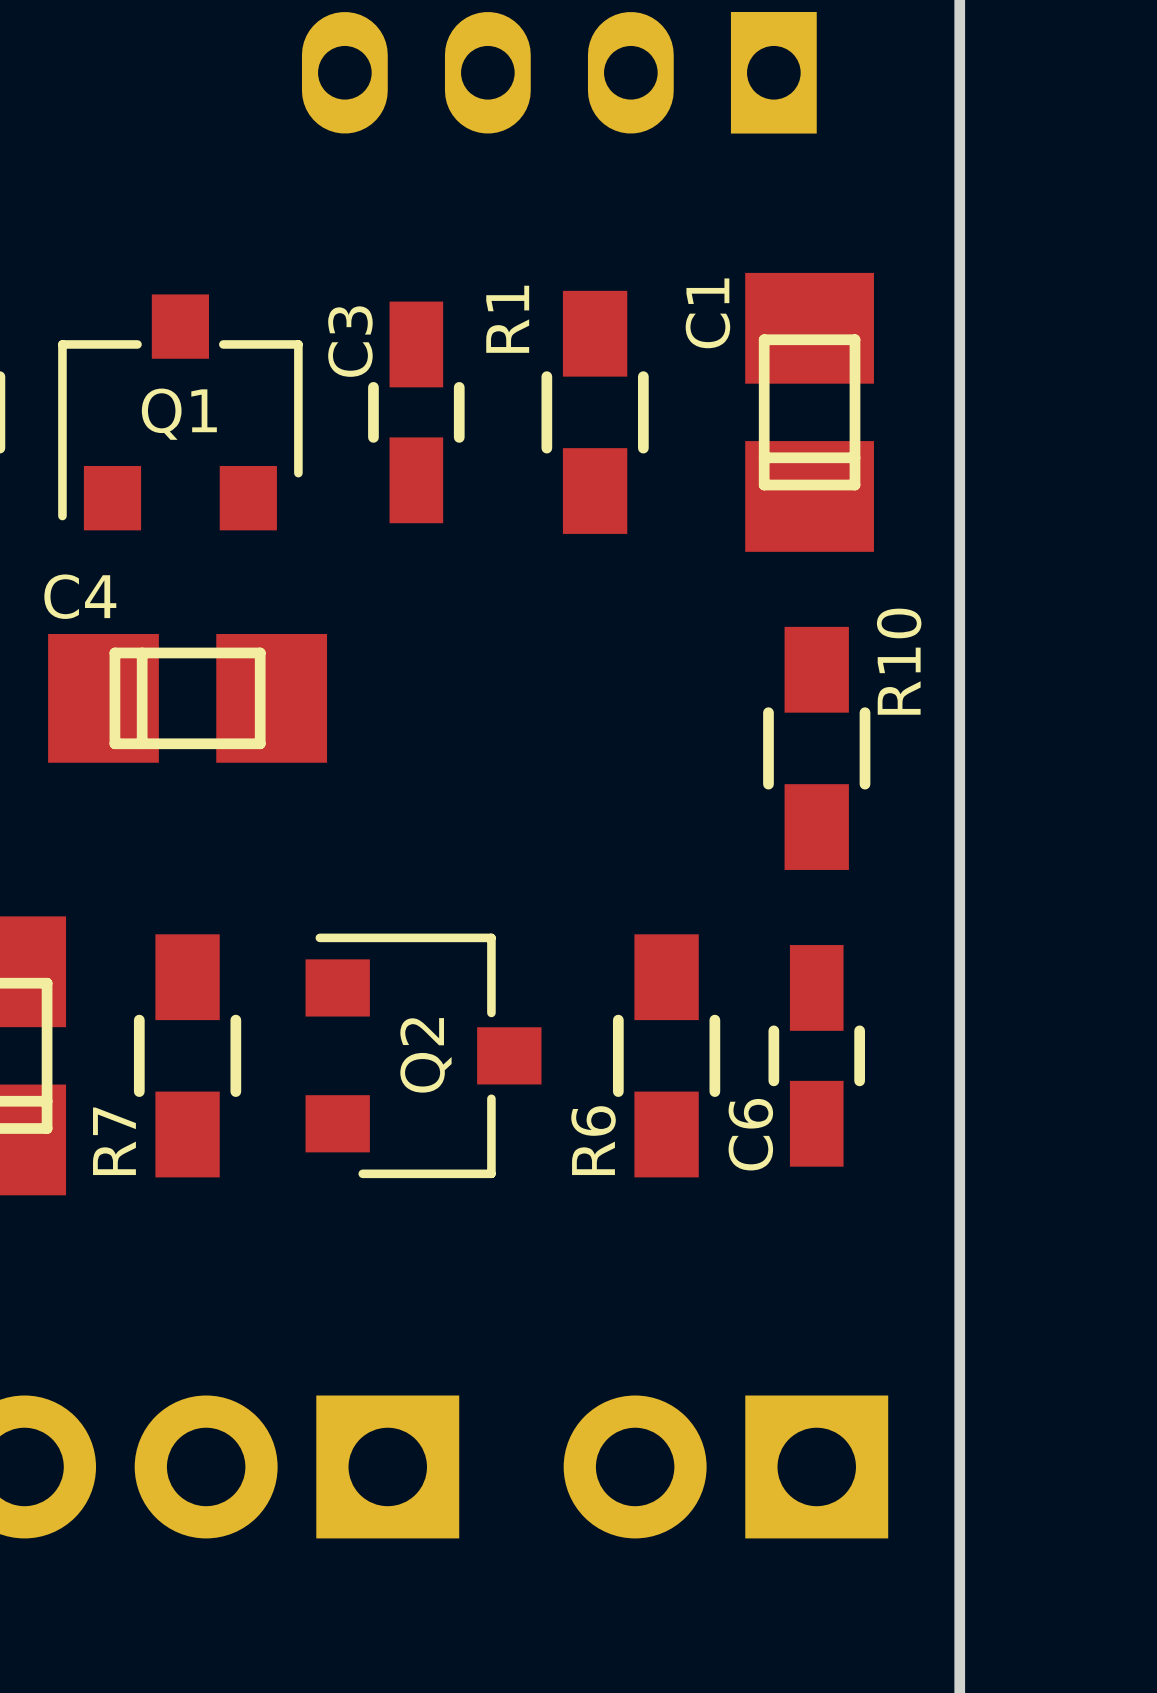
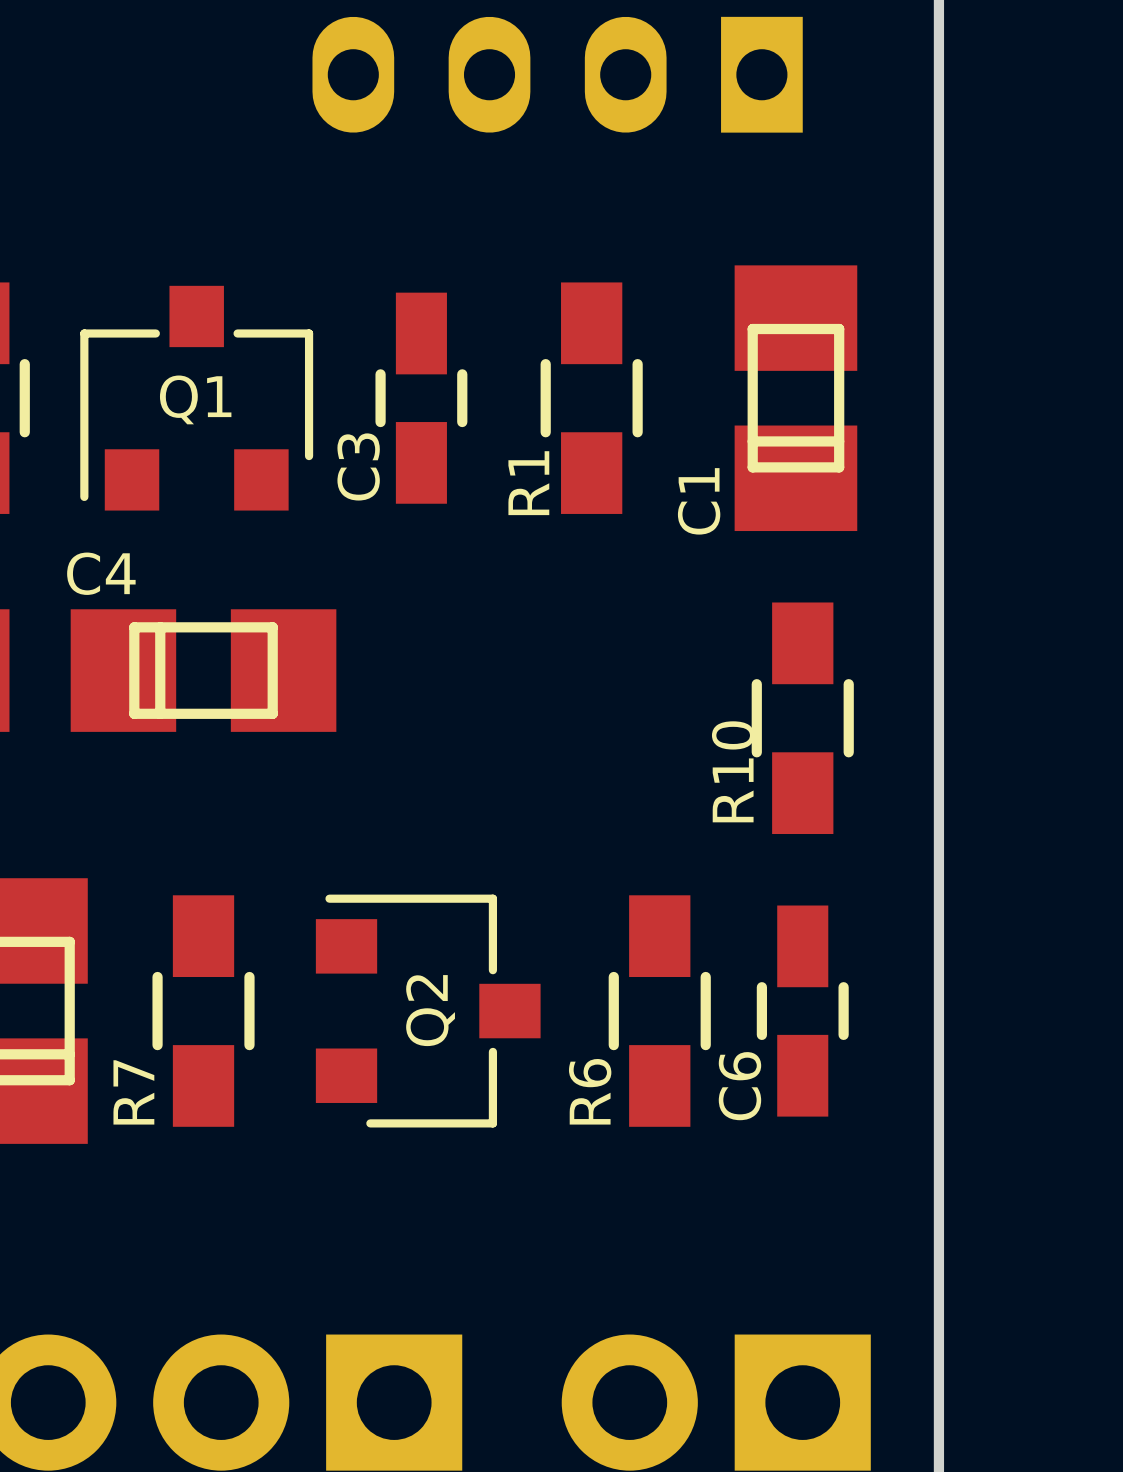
C1 name position: C1 (707, 313) -> C1 (699, 501)
R1 name position: R1 (507, 319) -> R1 (528, 483)
C3 name position: C3 (350, 341) -> C3 (358, 466)
R10 name position: R10 (899, 661) -> R10 (733, 771)

